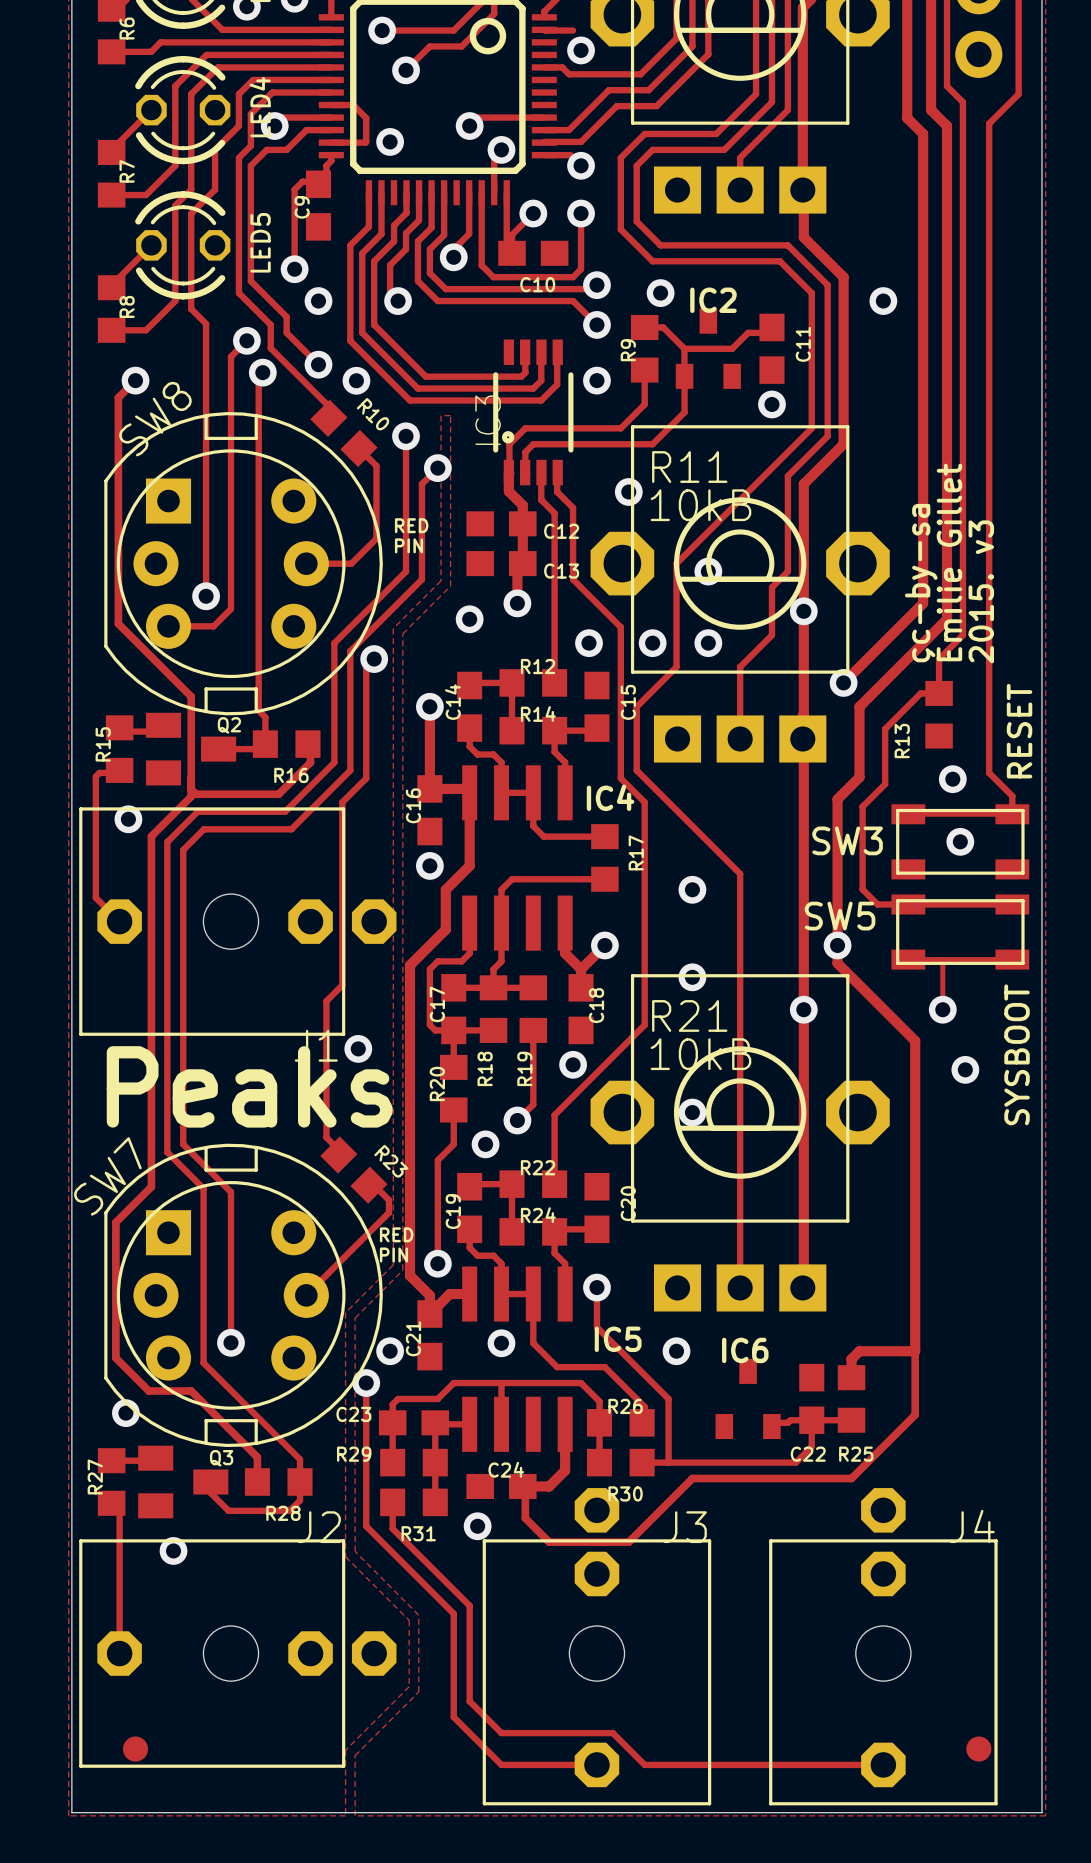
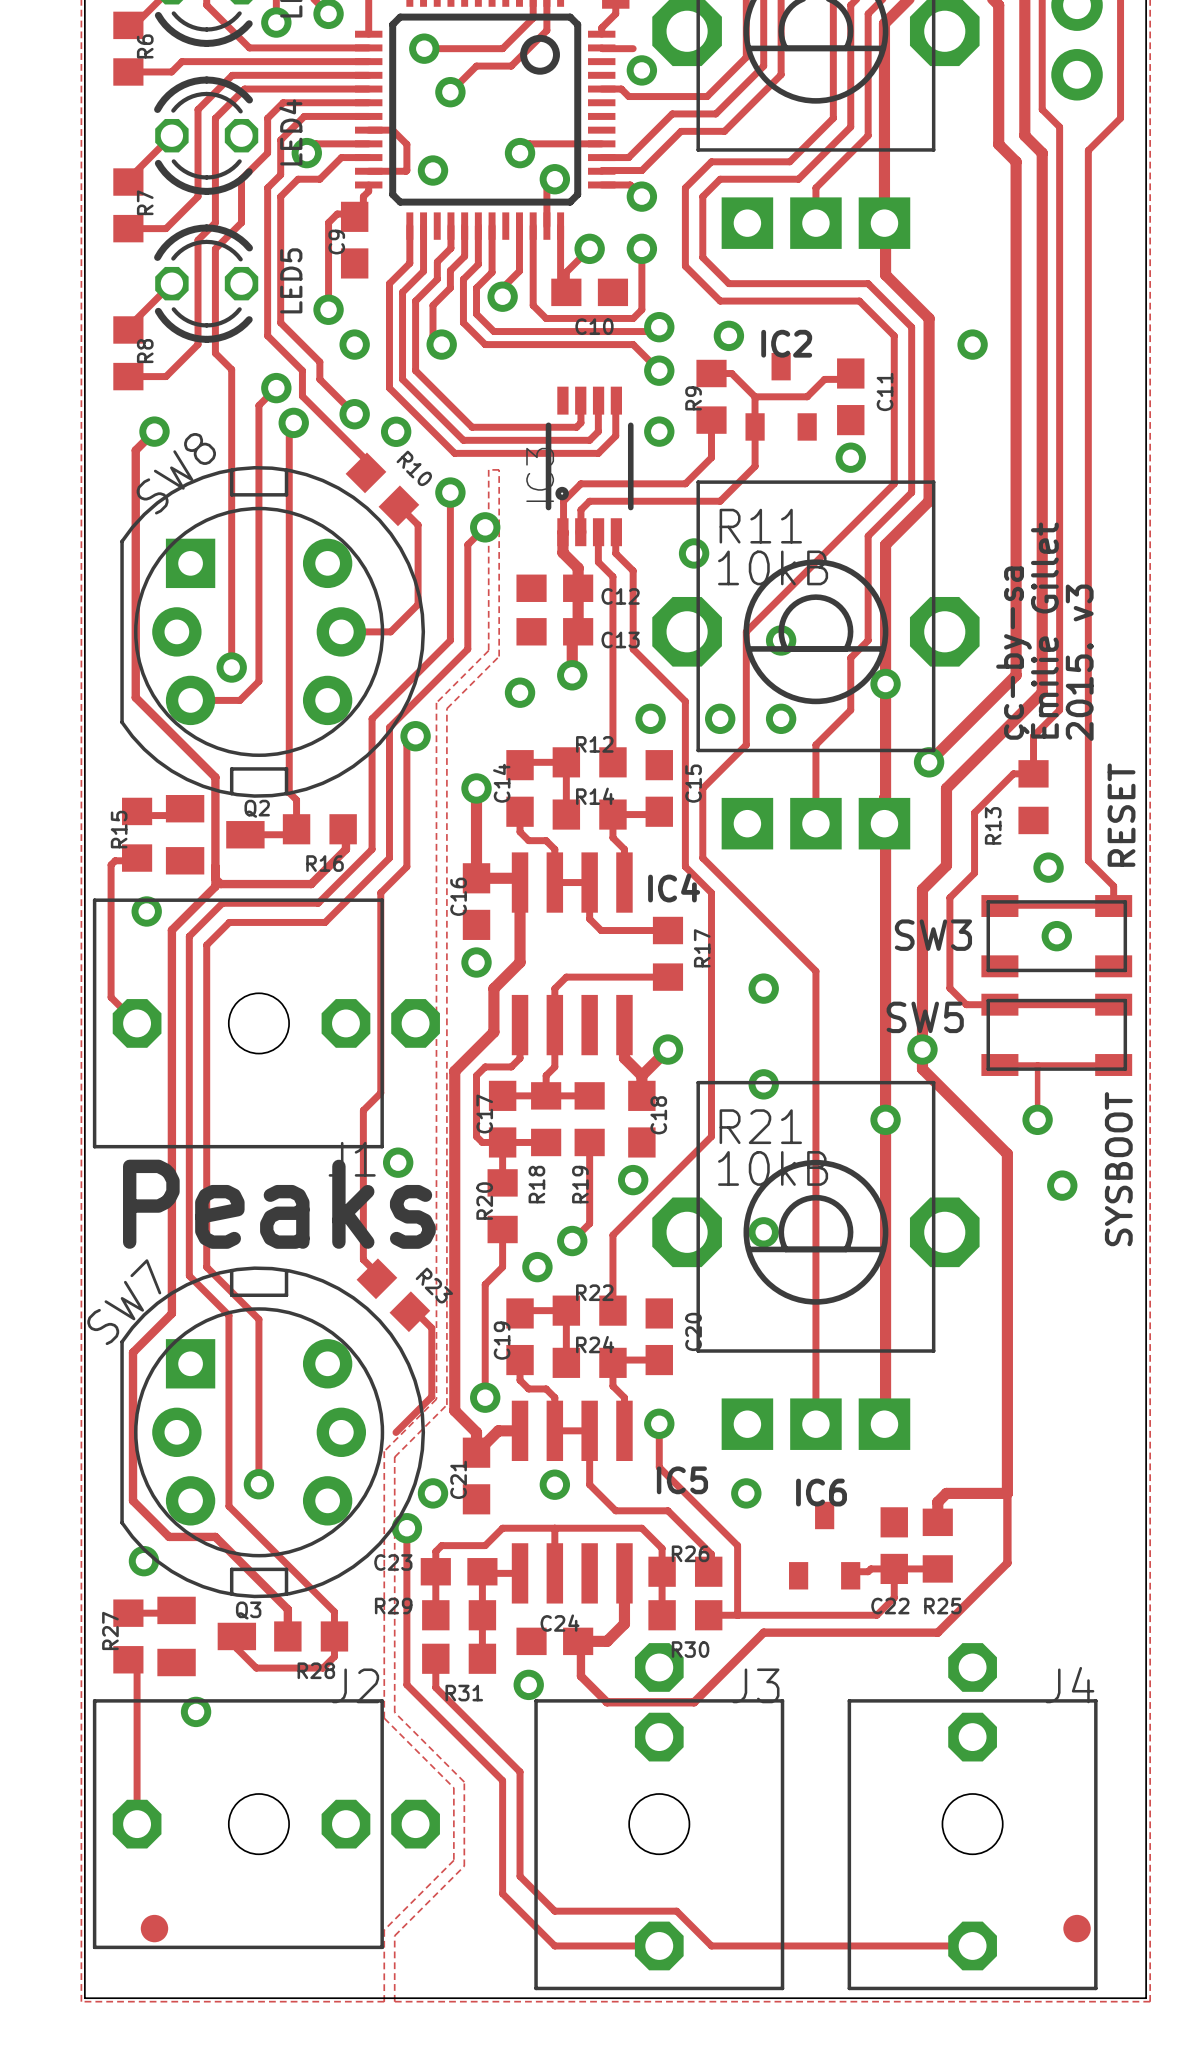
text: RED (411, 525) -> none
text: PIN (408, 545) -> none
track: (389, 1212) (306, 1295) -> (431, 1341) (431, 1396) (395, 1432)
text: RED (396, 1234) -> none
text: PIN (393, 1255) -> none

